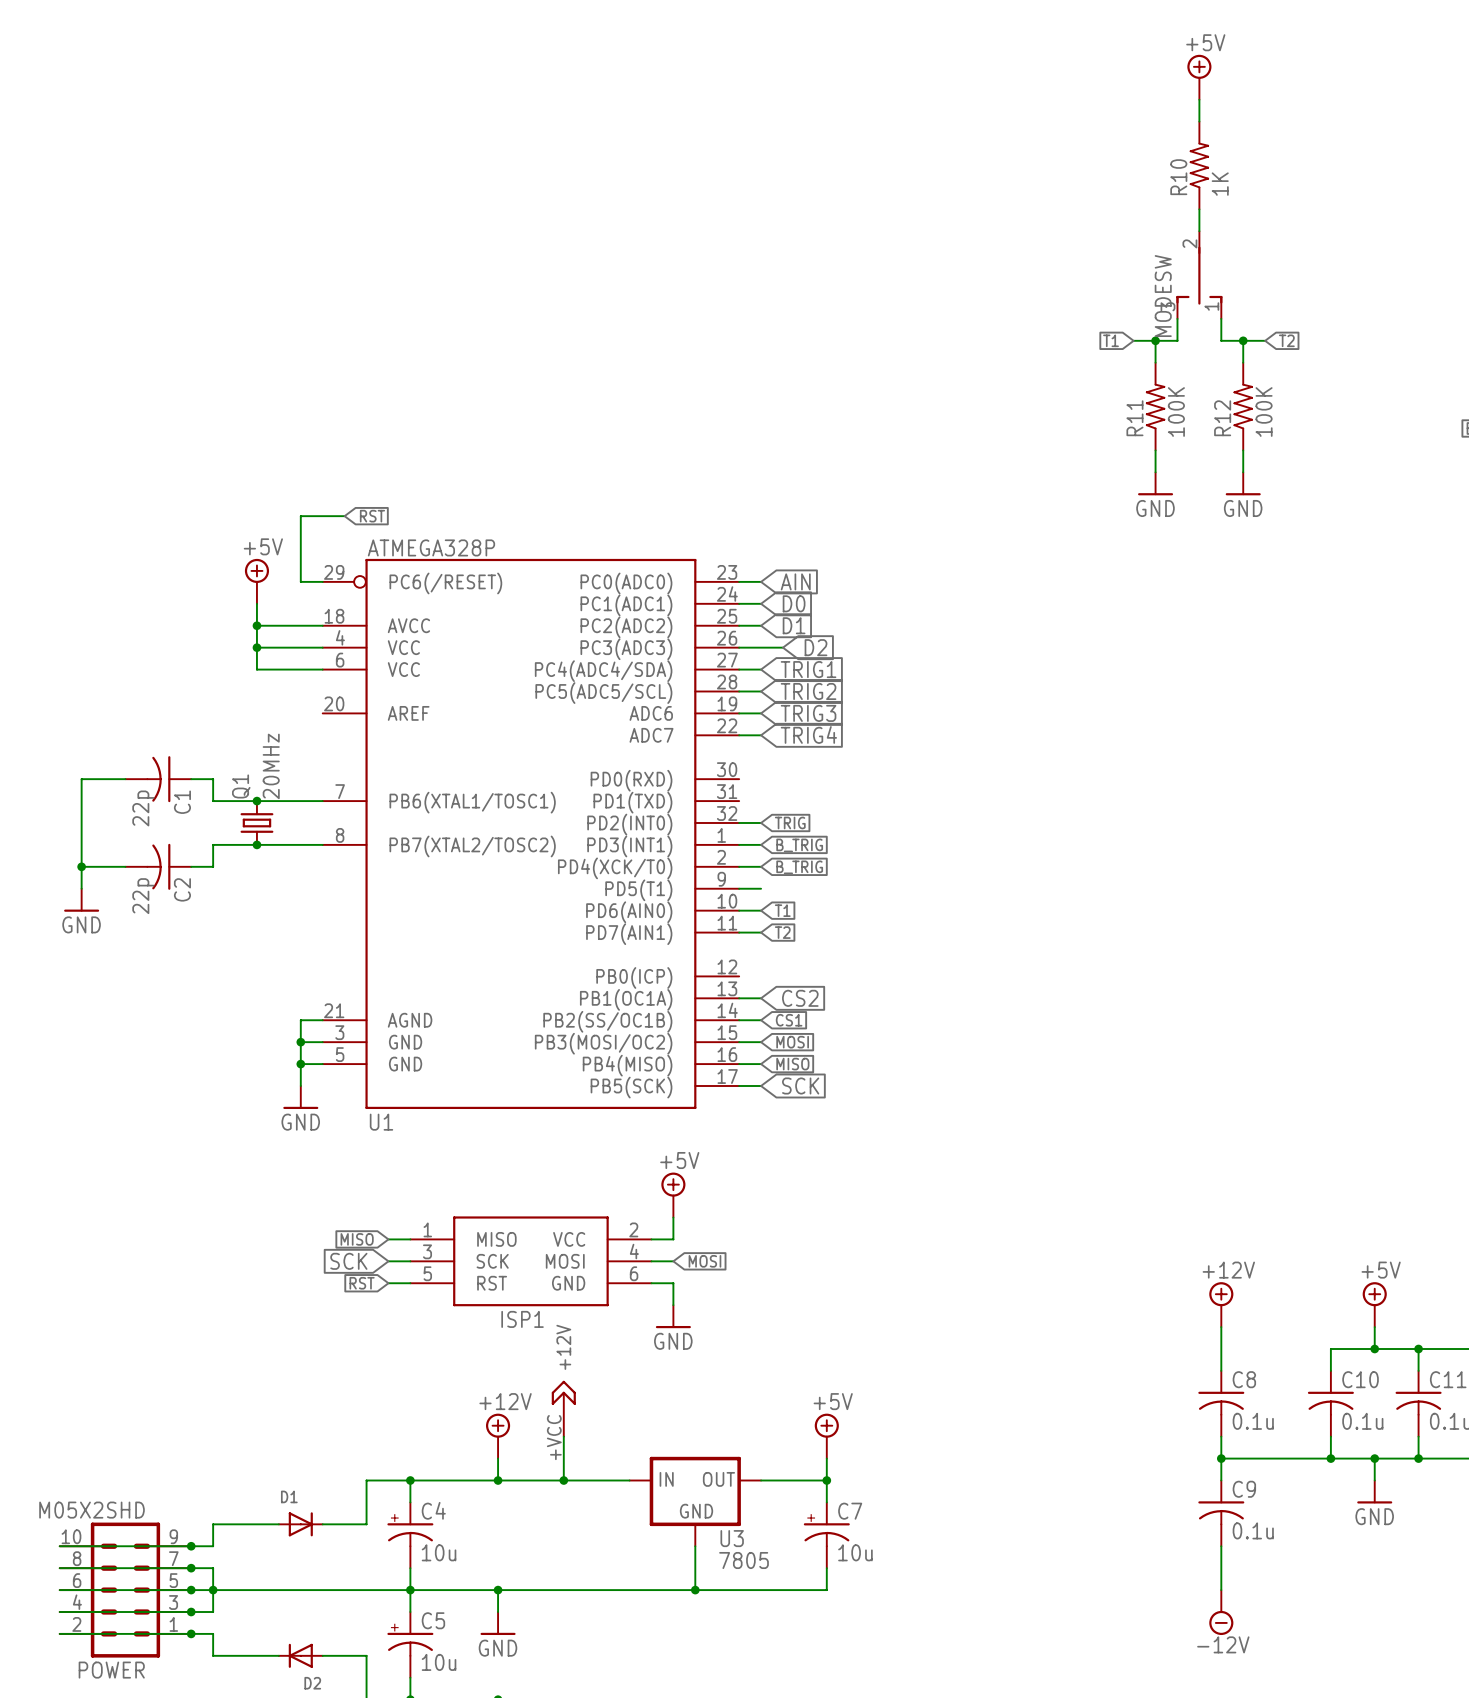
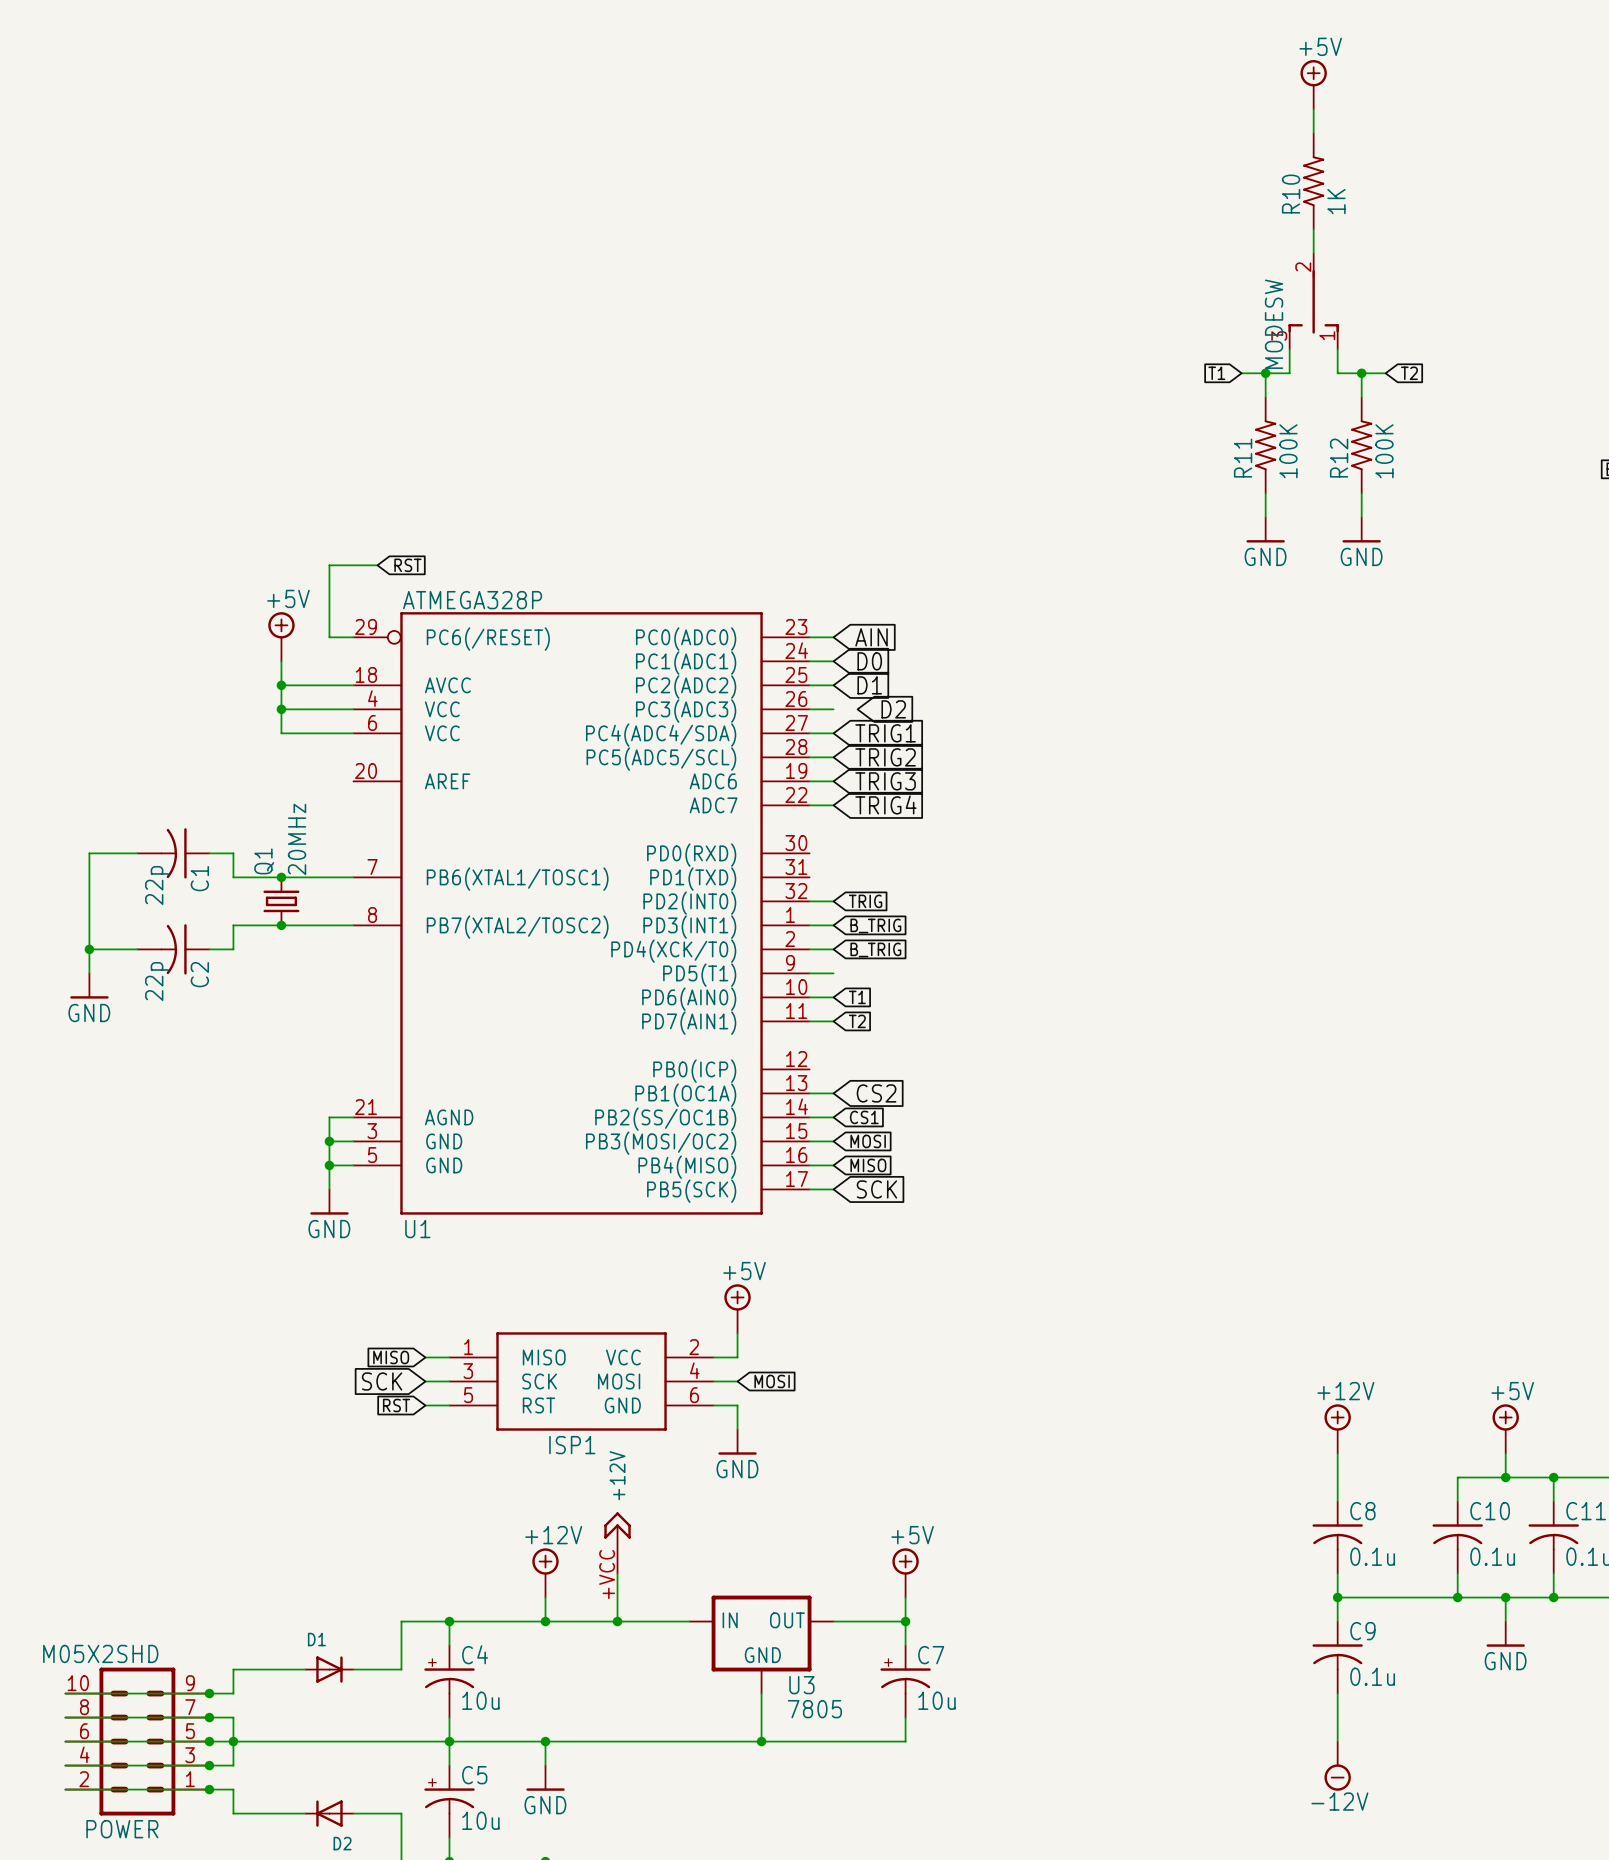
wire: (761, 647) (782, 647) -> none

